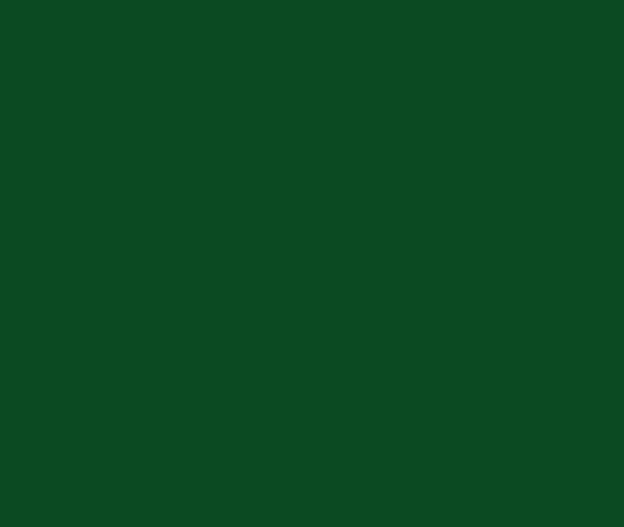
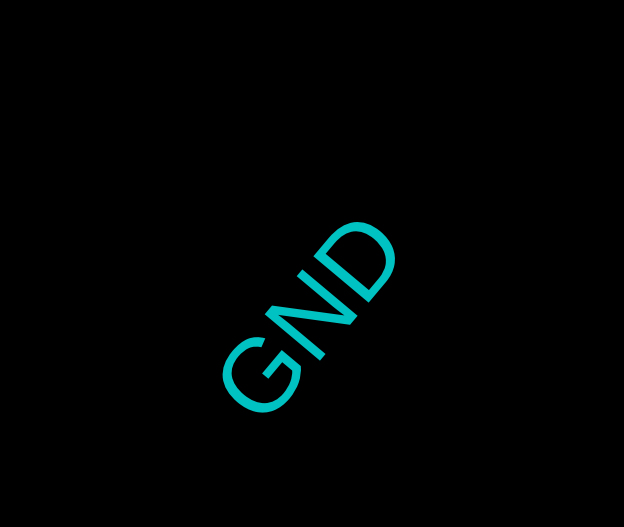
text: none -> GND (308, 317)

